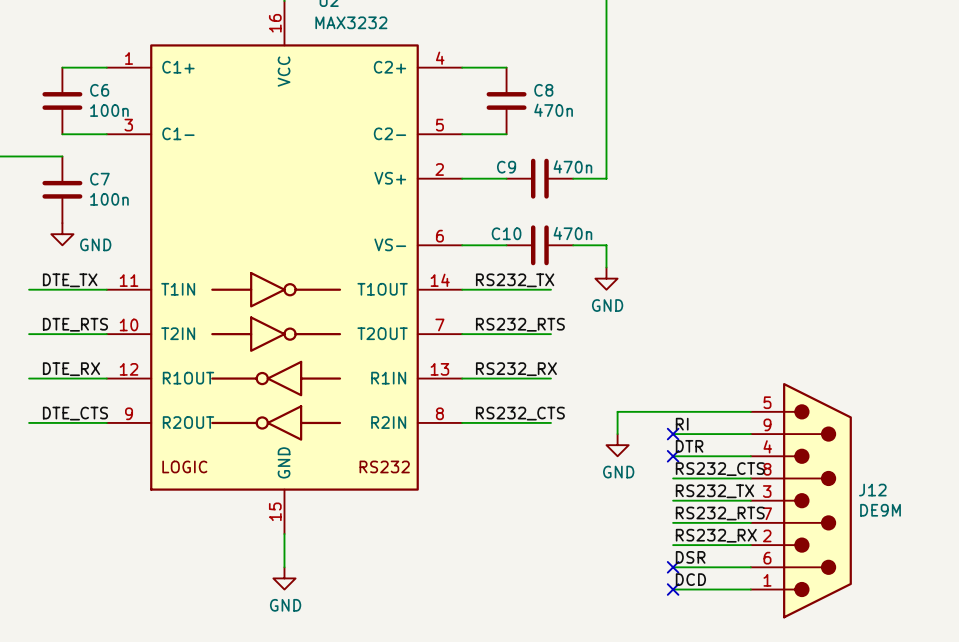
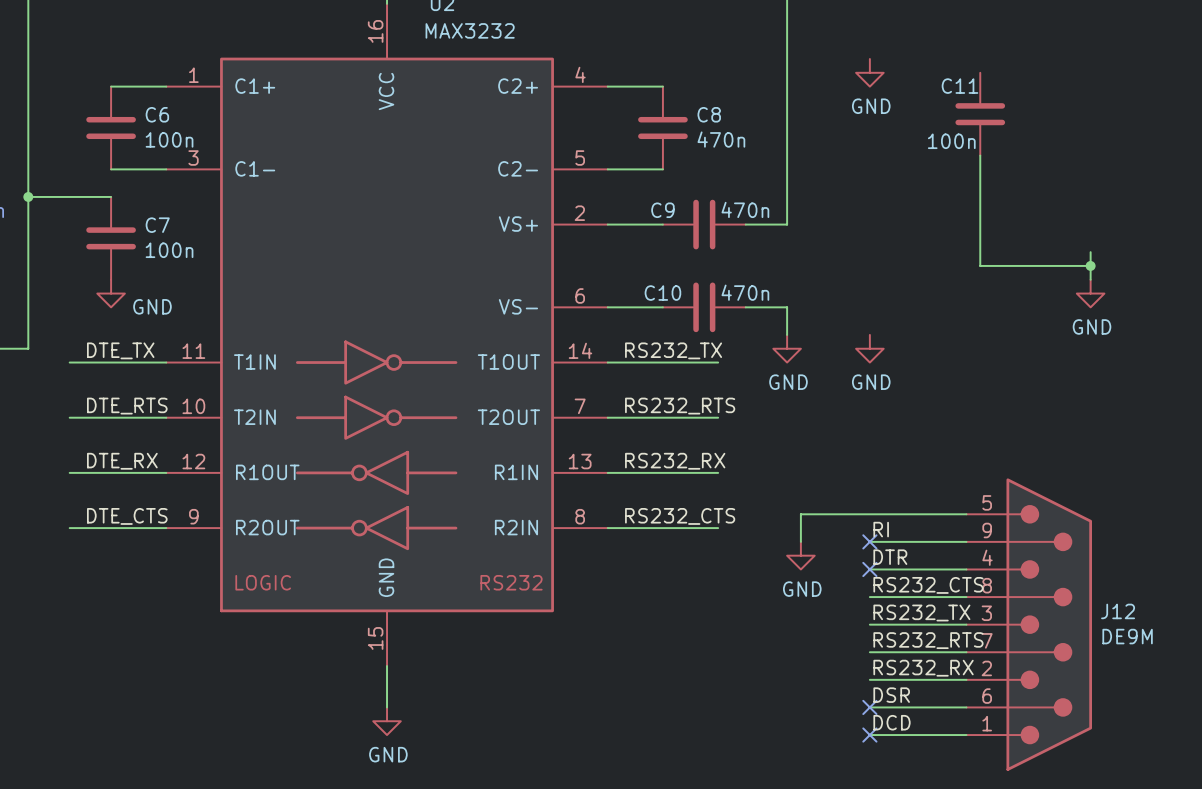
power symbol: none -> GND (869, 72)
C11: none -> 100n (980, 114)
wire: none -> (980, 155) (980, 265) (1090, 265)
wire: none -> (1090, 252) (1090, 279)
junction: none -> (1090, 265)
power symbol: none -> GND (1090, 293)
power symbol: none -> GND (869, 348)

